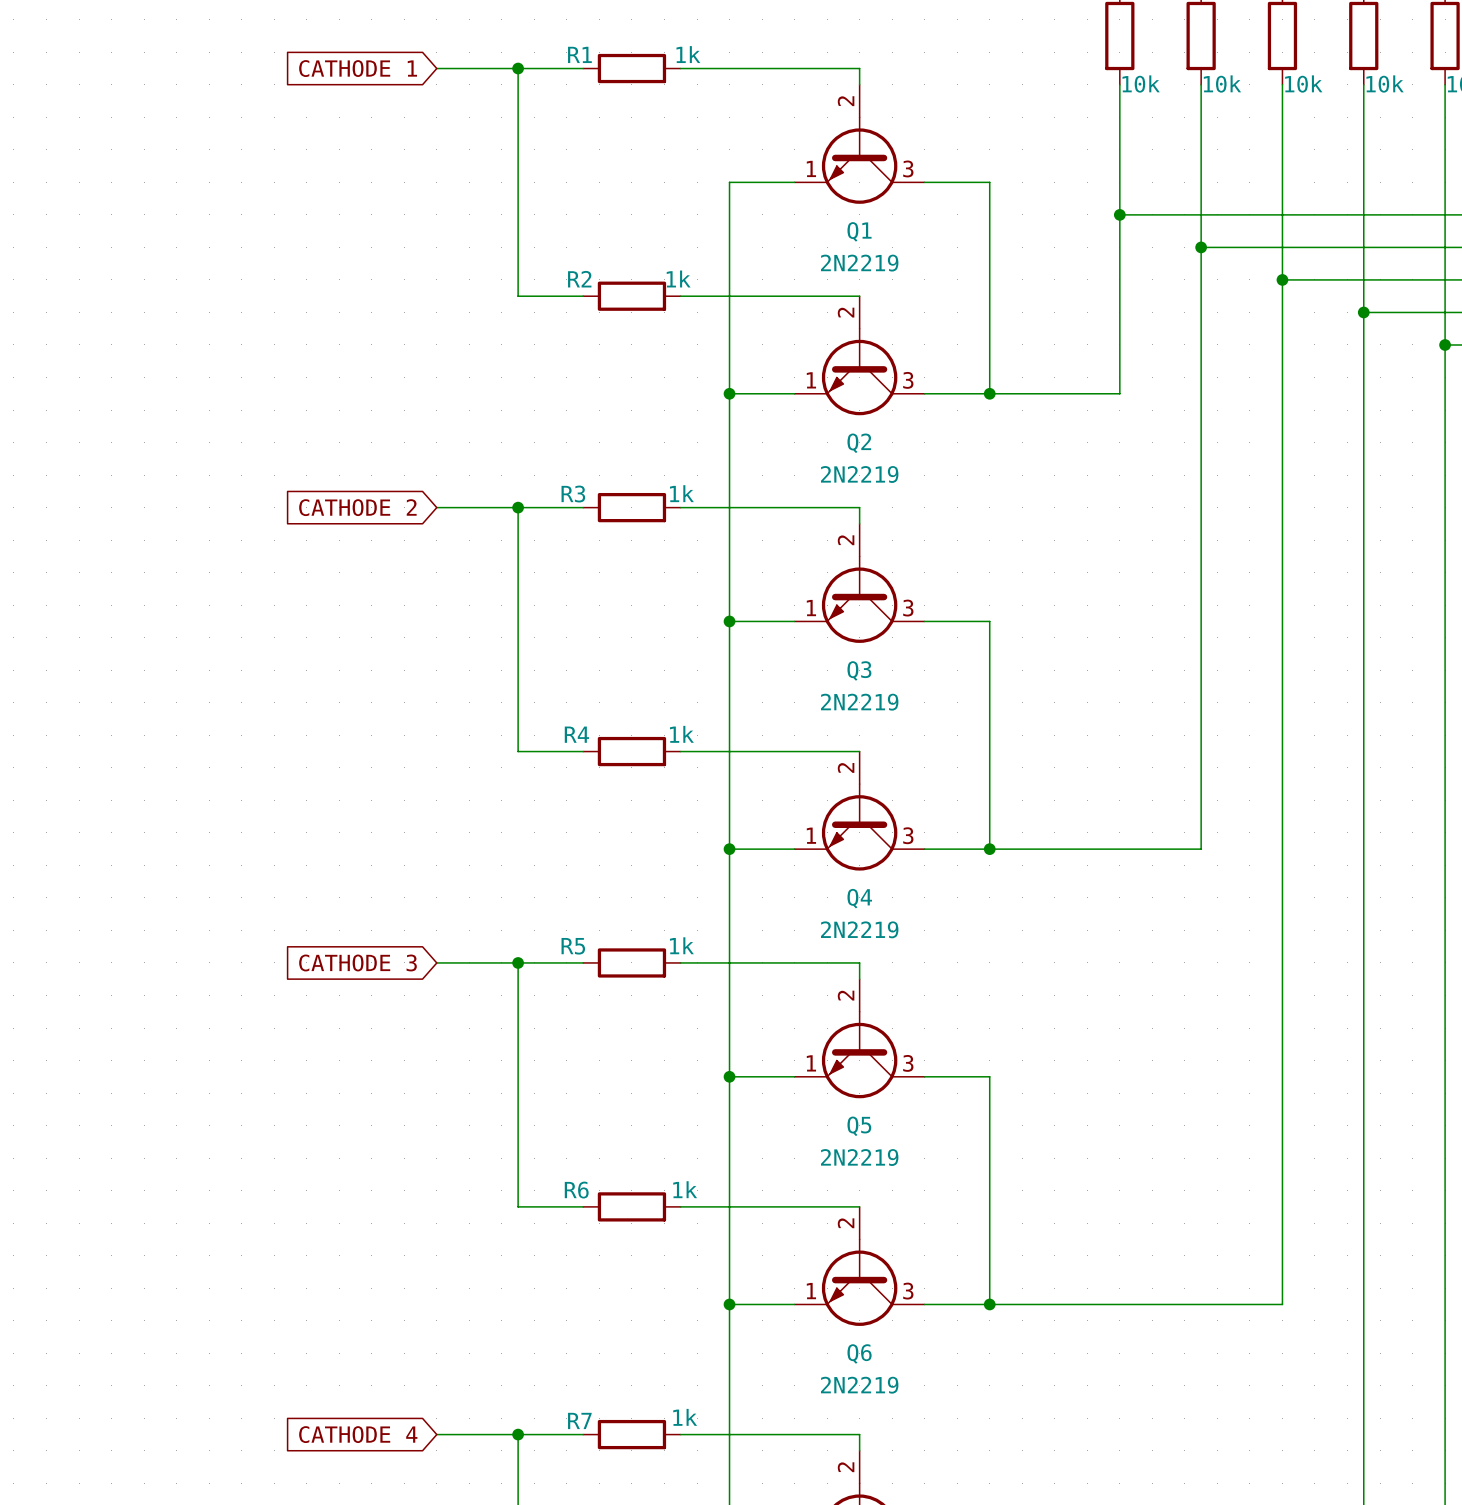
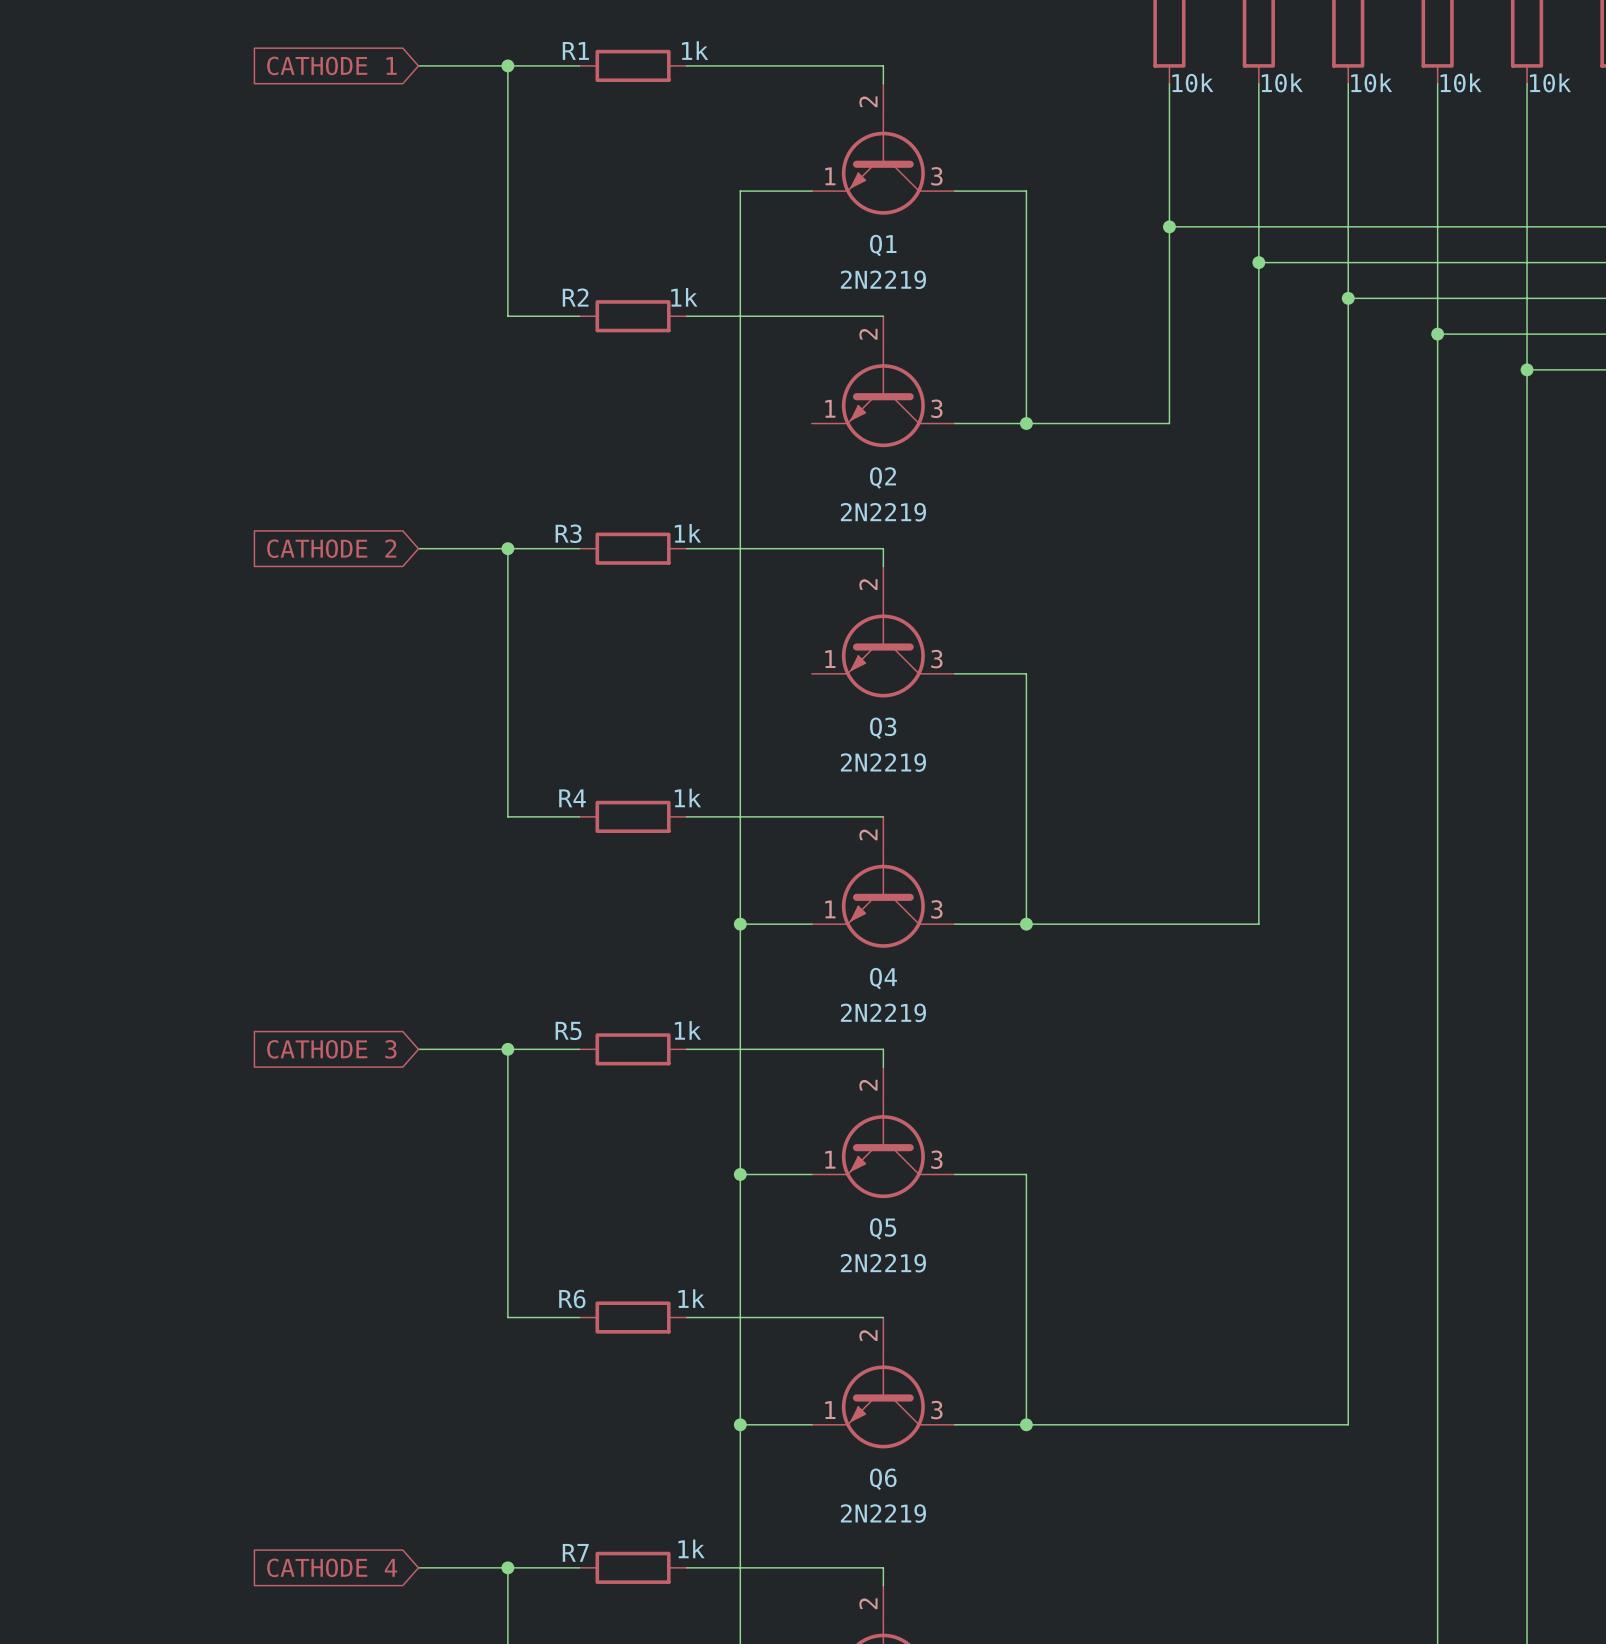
wire: (729, 393) (794, 393) -> none
junction: (729, 393) -> none
wire: (729, 621) (794, 621) -> none
junction: (729, 621) -> none

